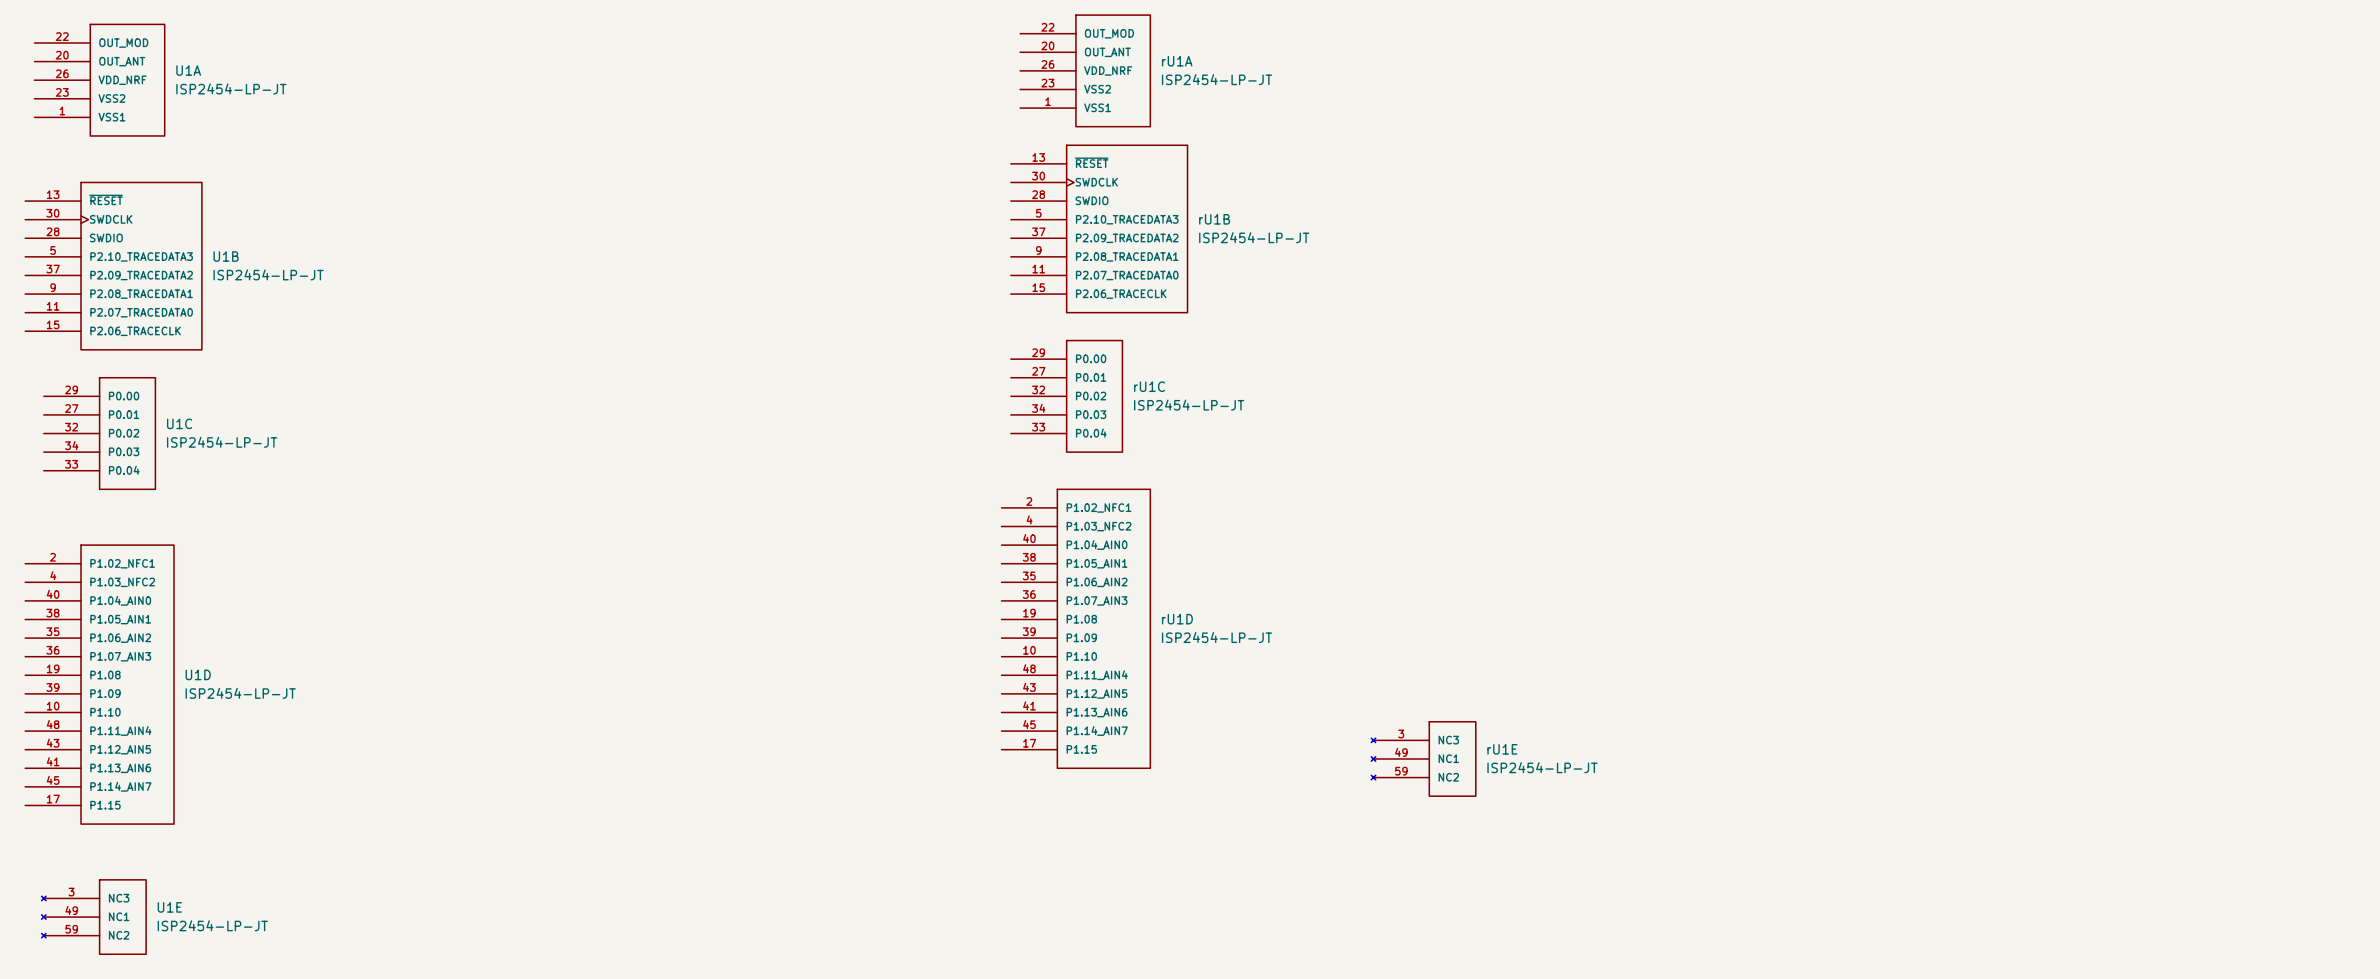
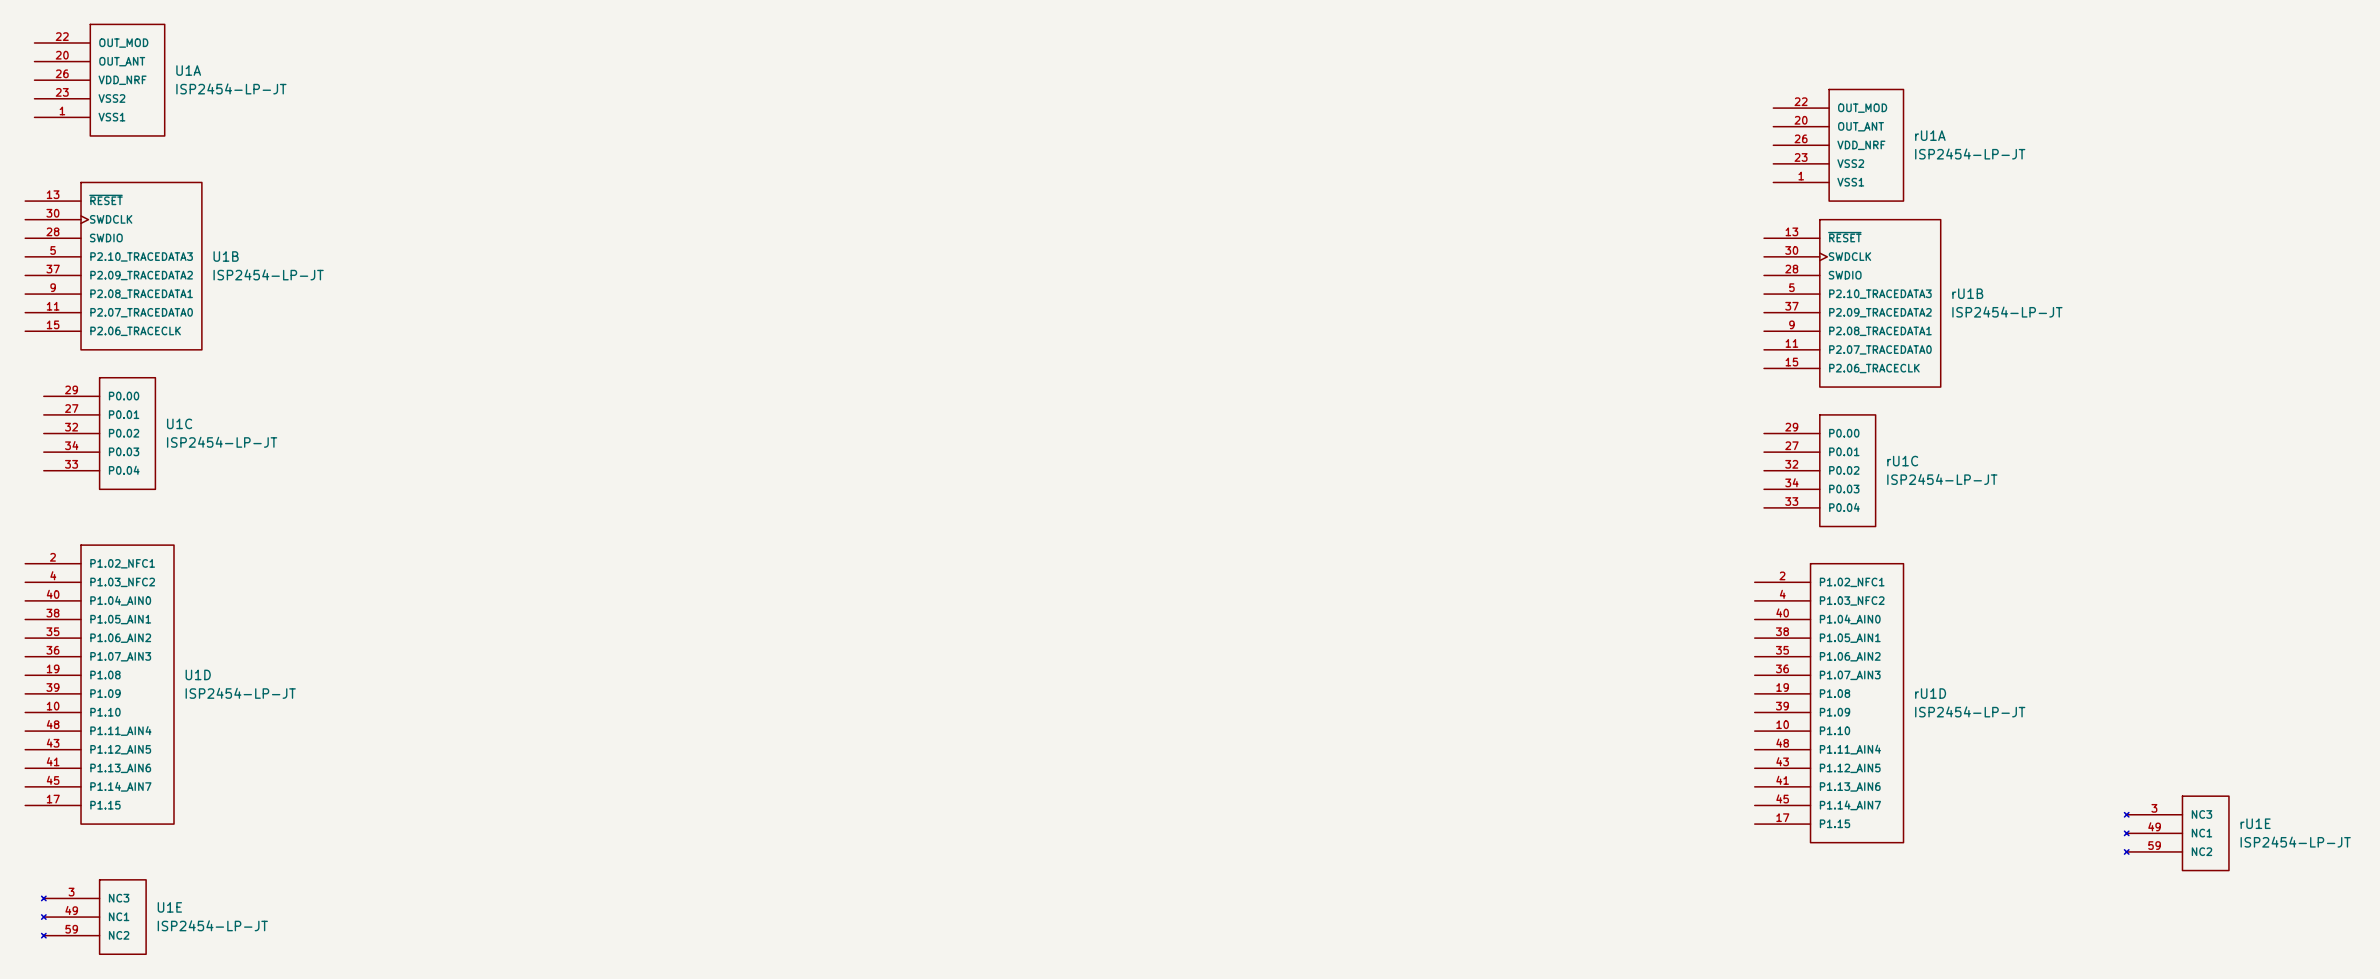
rU1A position: (1085, 70) -> (1838, 145)
rU1B position: (1099, 228) -> (1852, 303)
rU1C position: (1066, 396) -> (1819, 470)
rU1D position: (1075, 628) -> (1829, 703)
rU1E position: (1423, 758) -> (2176, 833)

